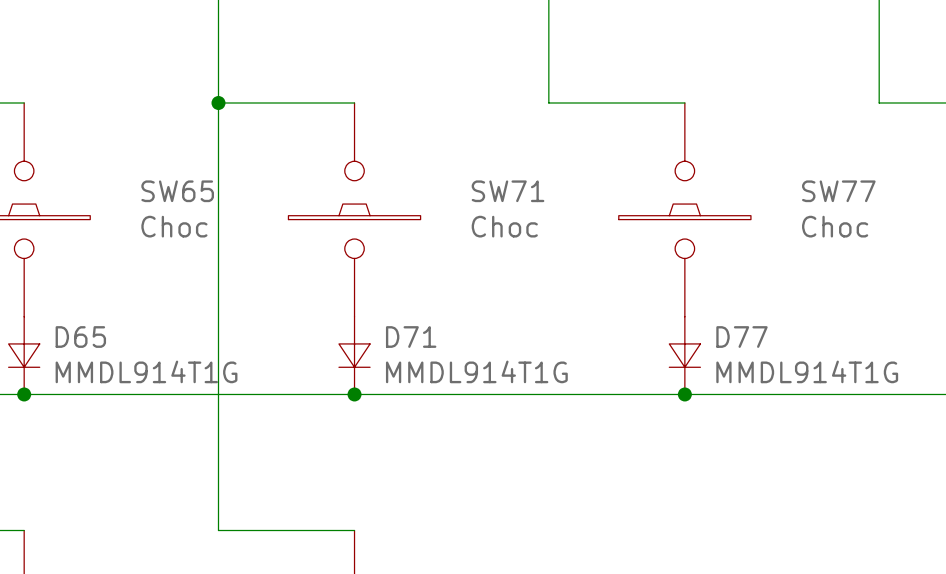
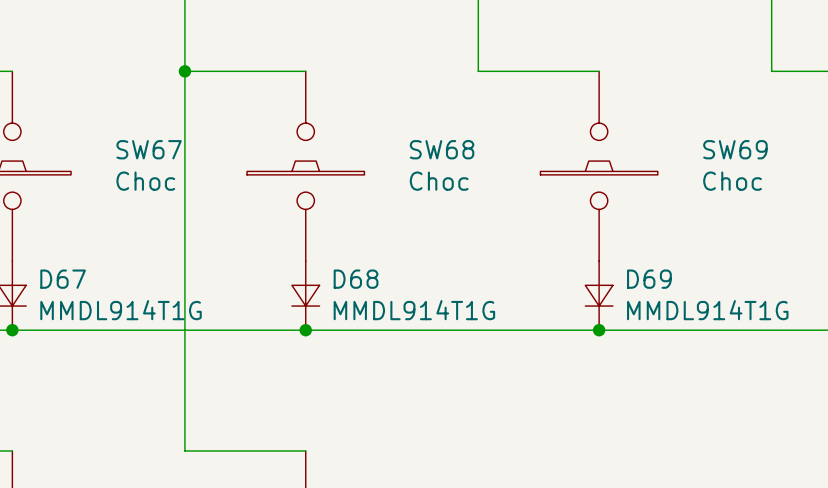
SW65 name: SW65 (177, 191) -> SW67 (149, 149)
SW71 name: SW71 (508, 191) -> SW68 (442, 149)
SW77 name: SW77 (838, 191) -> SW69 (735, 149)
D65 name: D65 (80, 337) -> D67 (63, 279)
D71 name: D71 (411, 337) -> D68 (356, 279)
D77 name: D77 (741, 337) -> D69 (649, 279)

